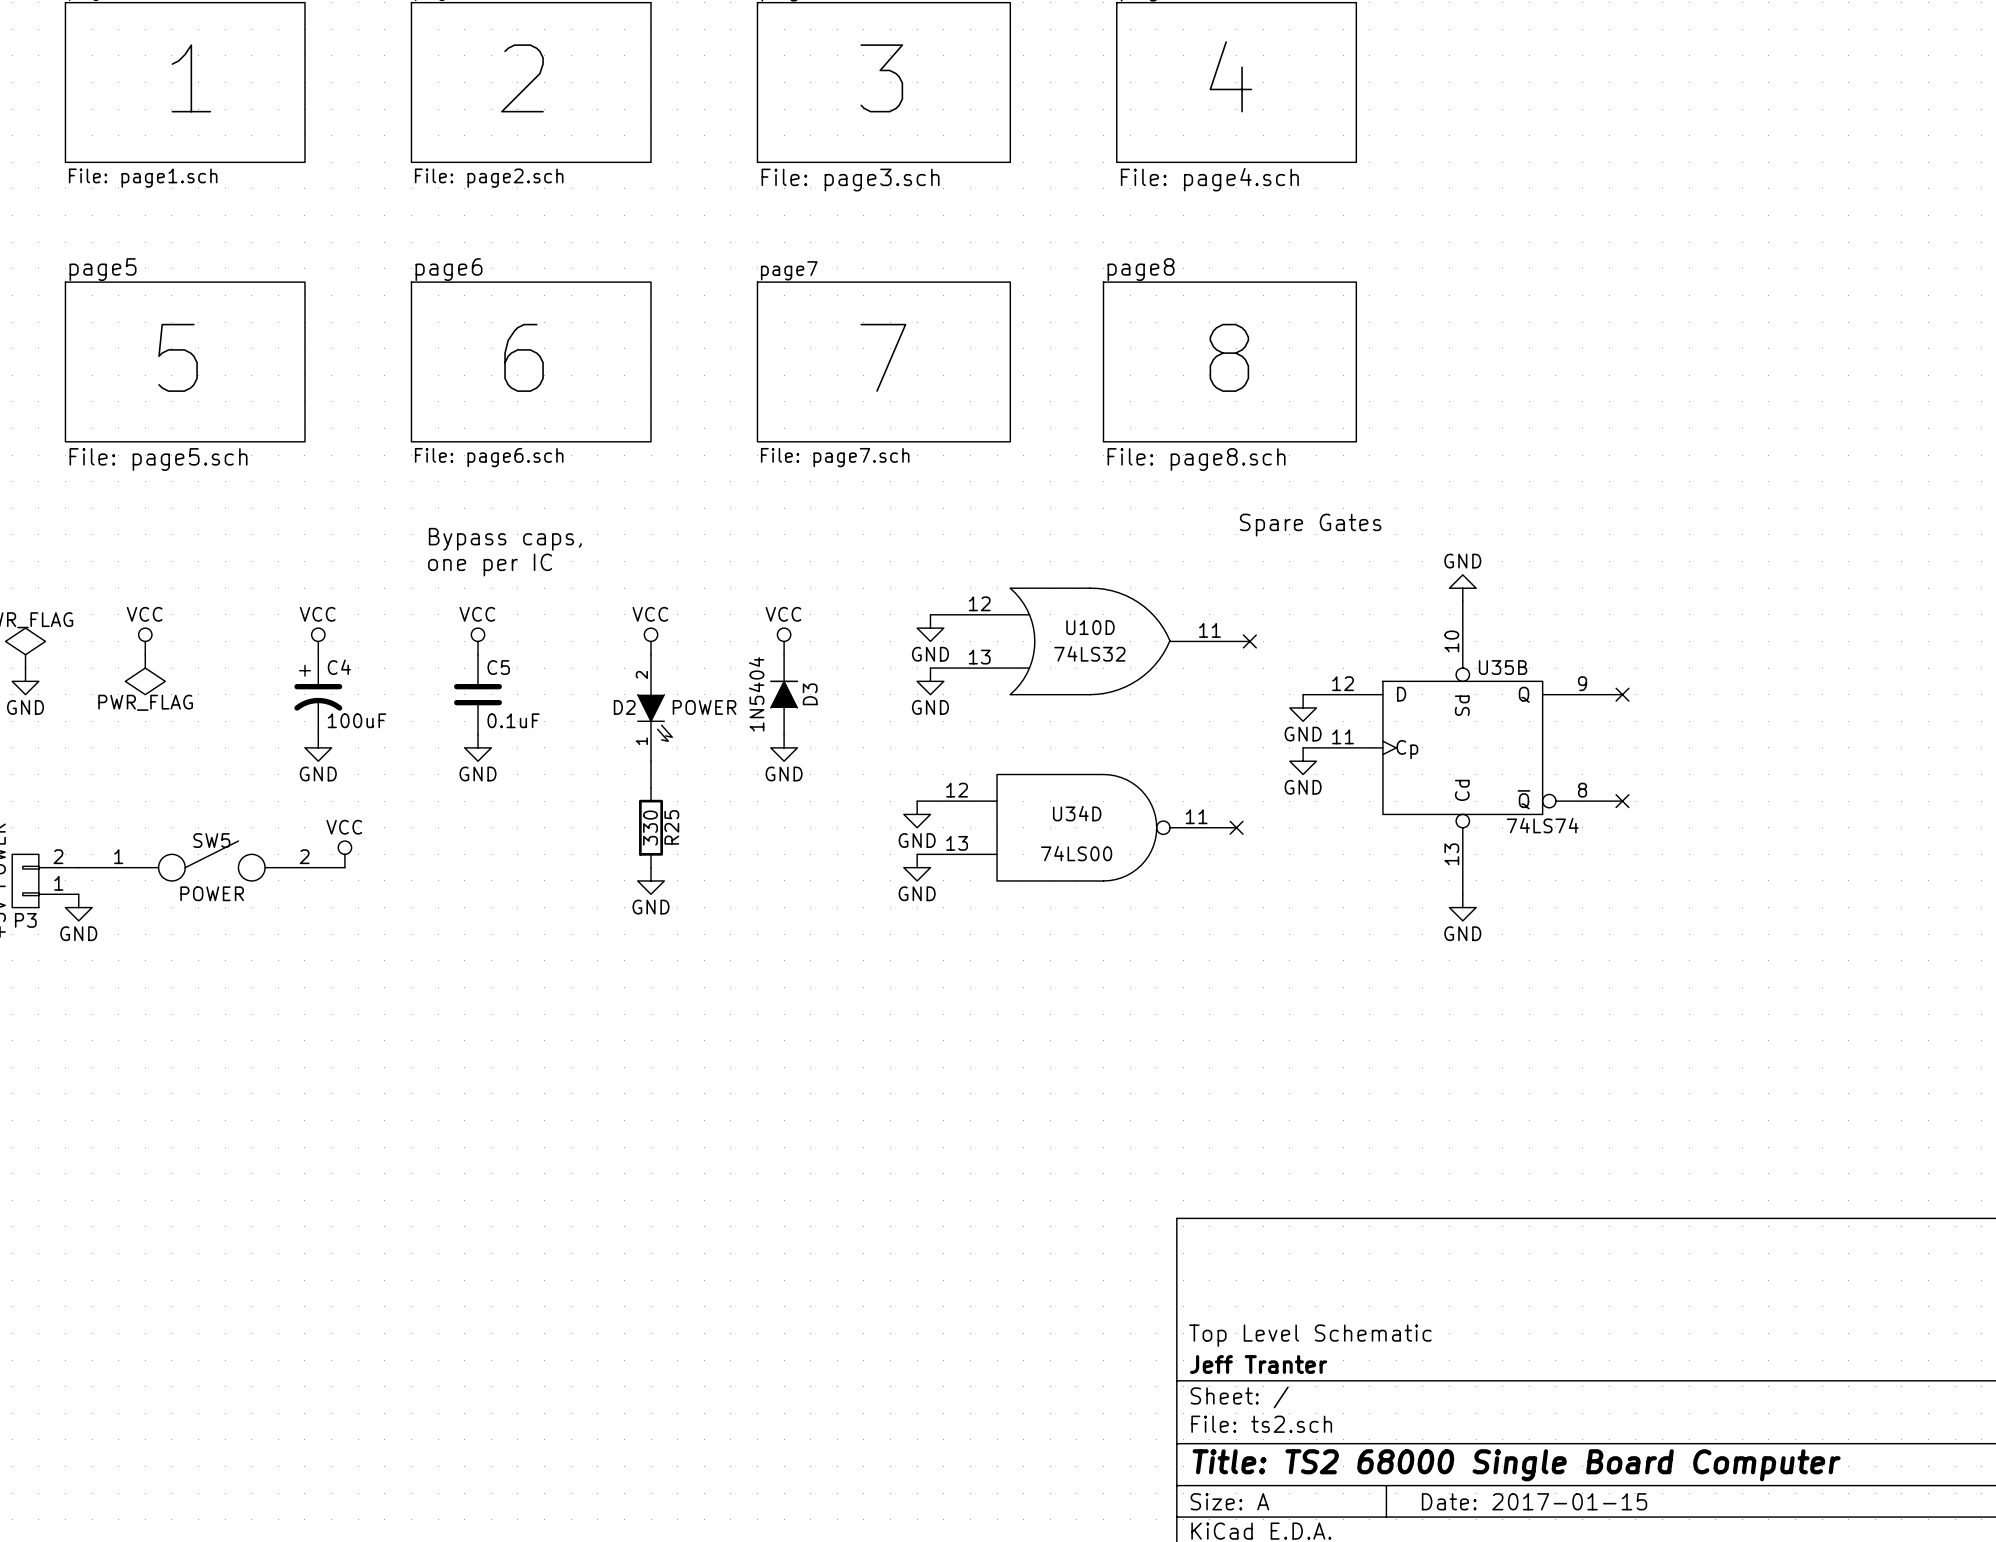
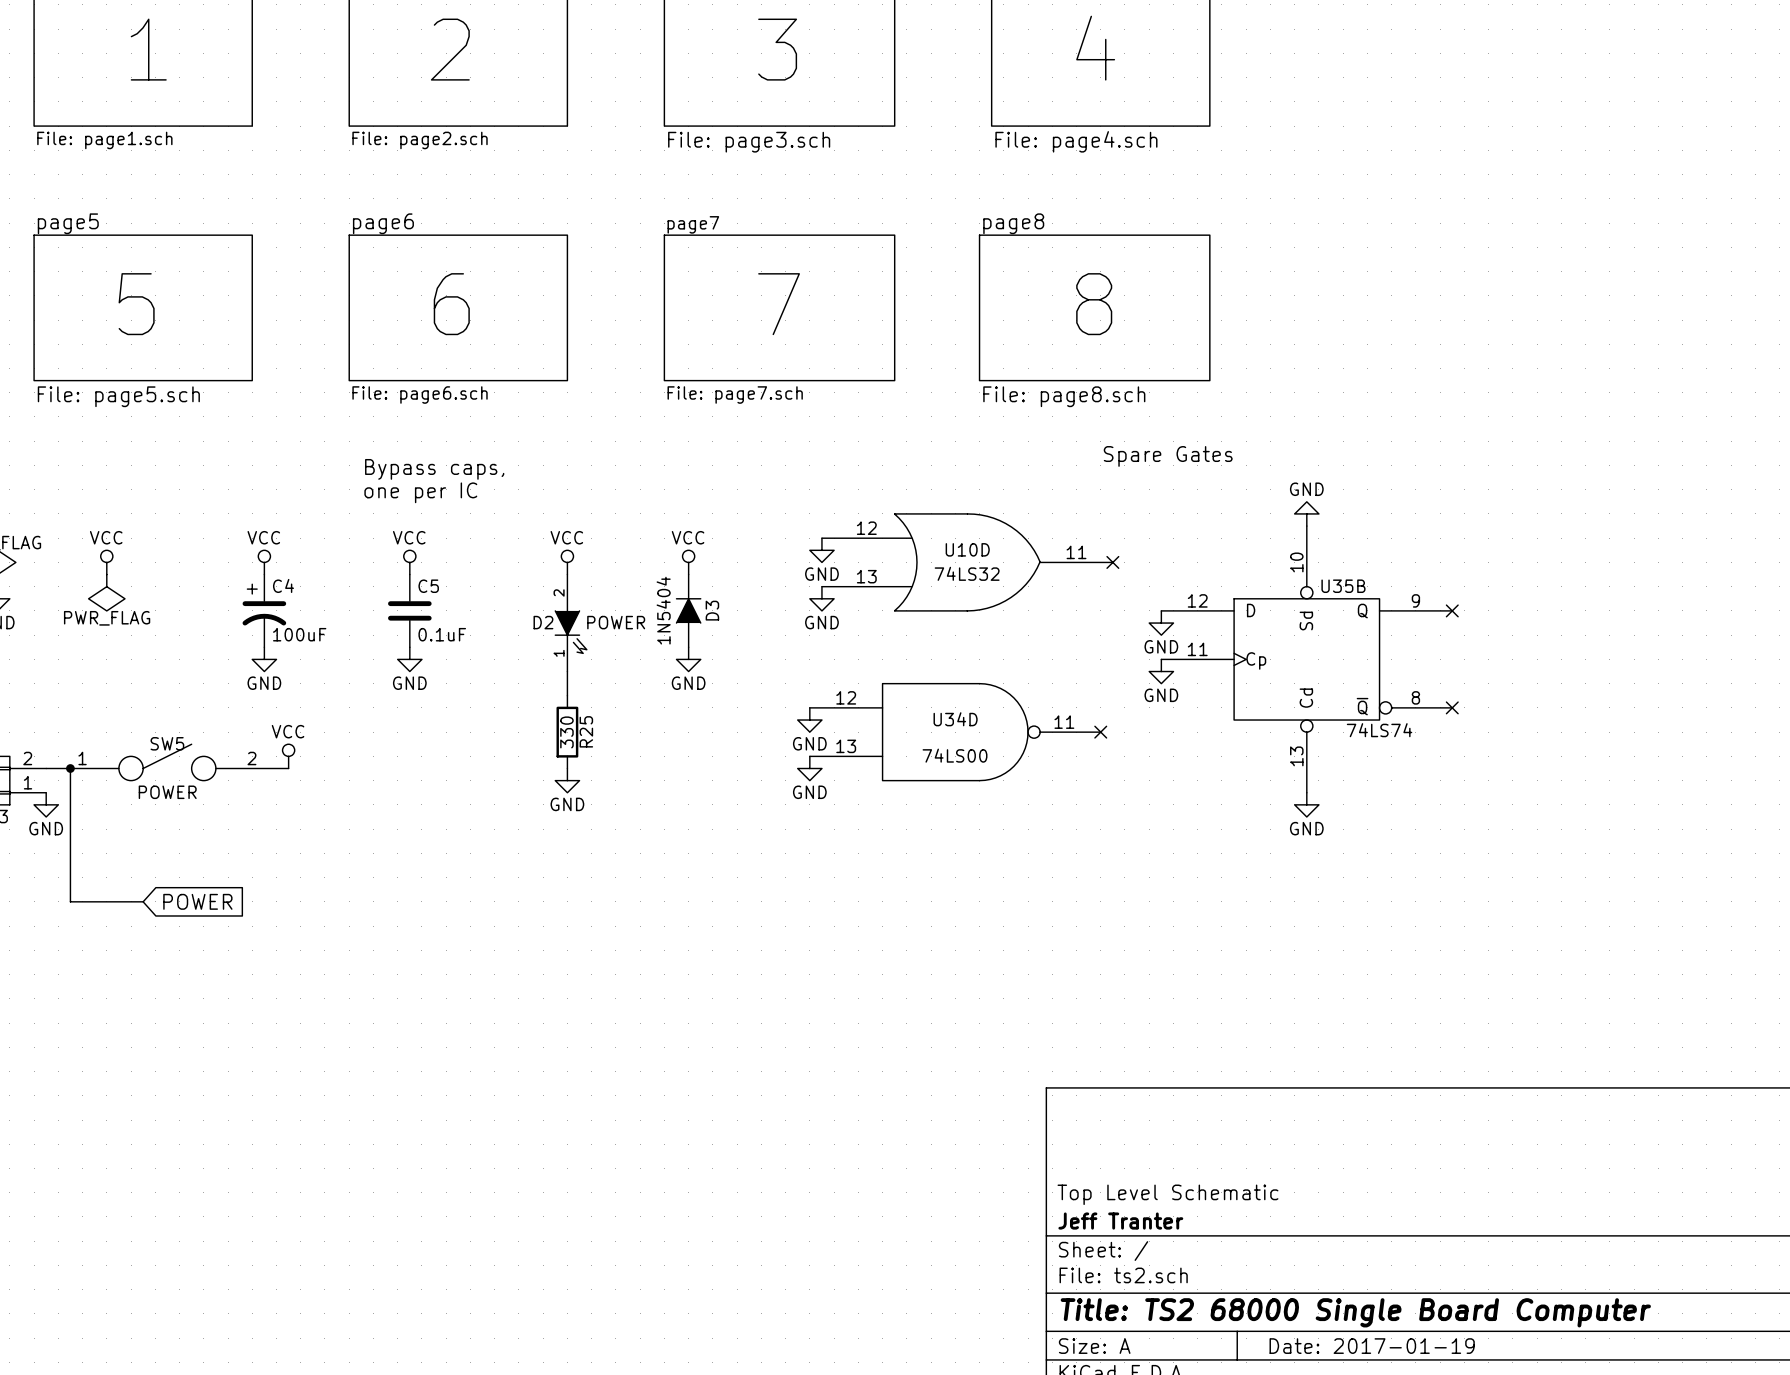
wire: none -> (70, 768) (70, 901) (143, 901)
junction: none -> (70, 768)
global label: none -> POWER (197, 901)
title block: Date: 2017-01-15 (1534, 1501) -> Date: 2017-01-19 (1372, 1346)

